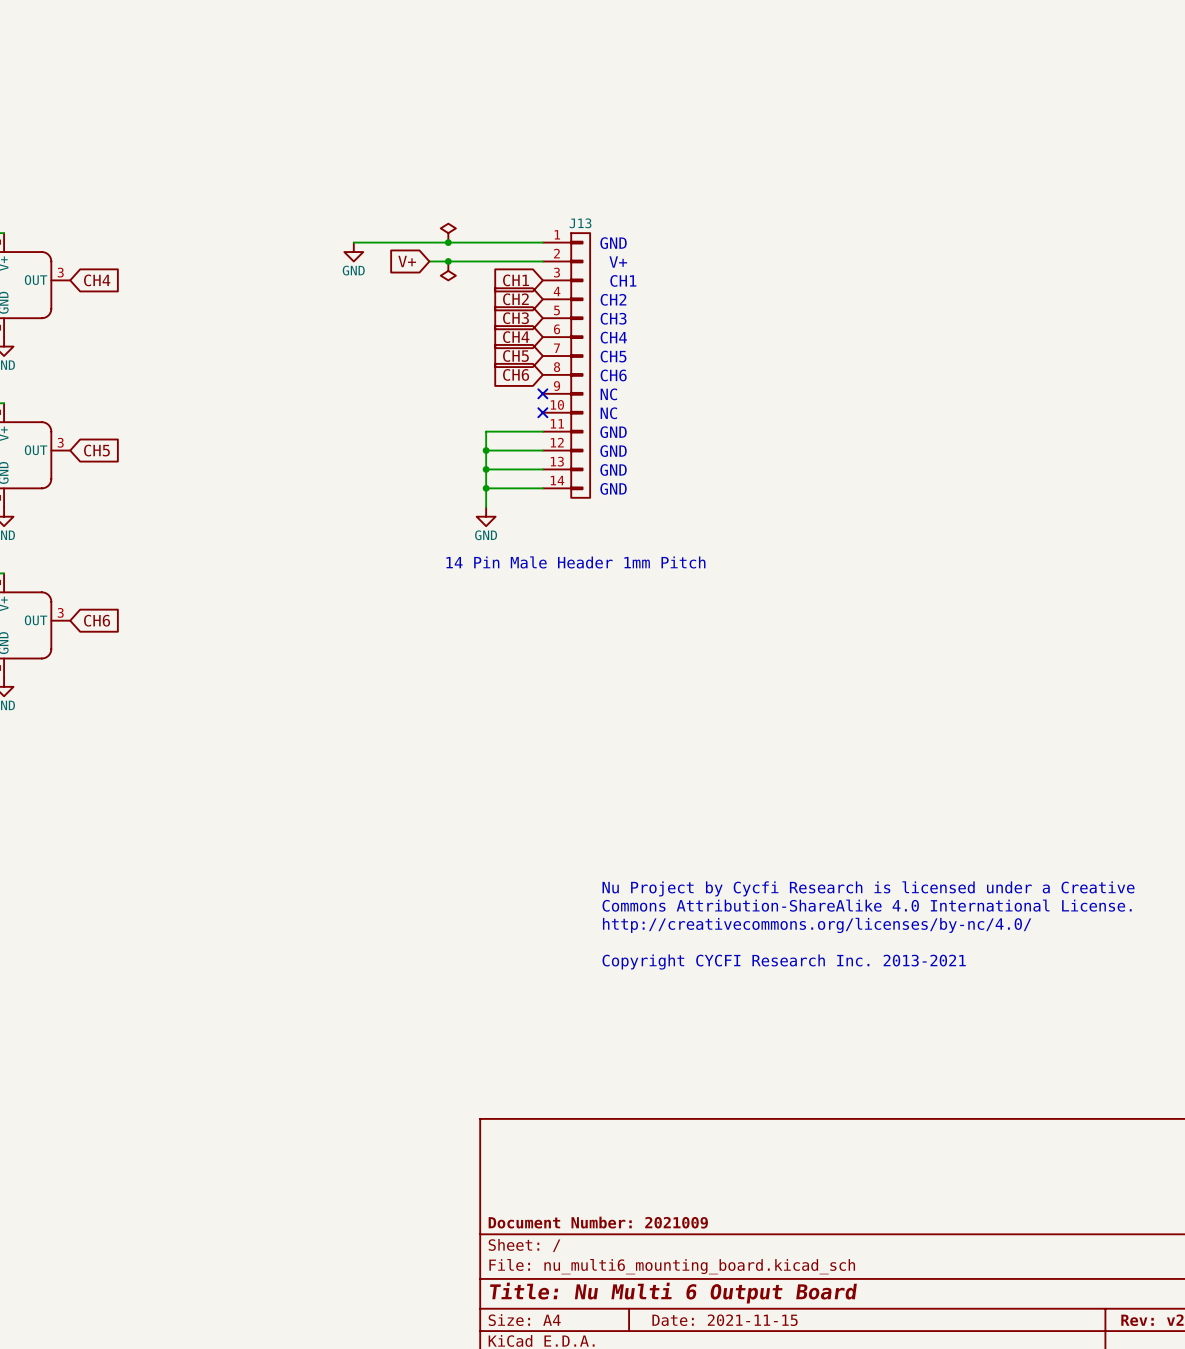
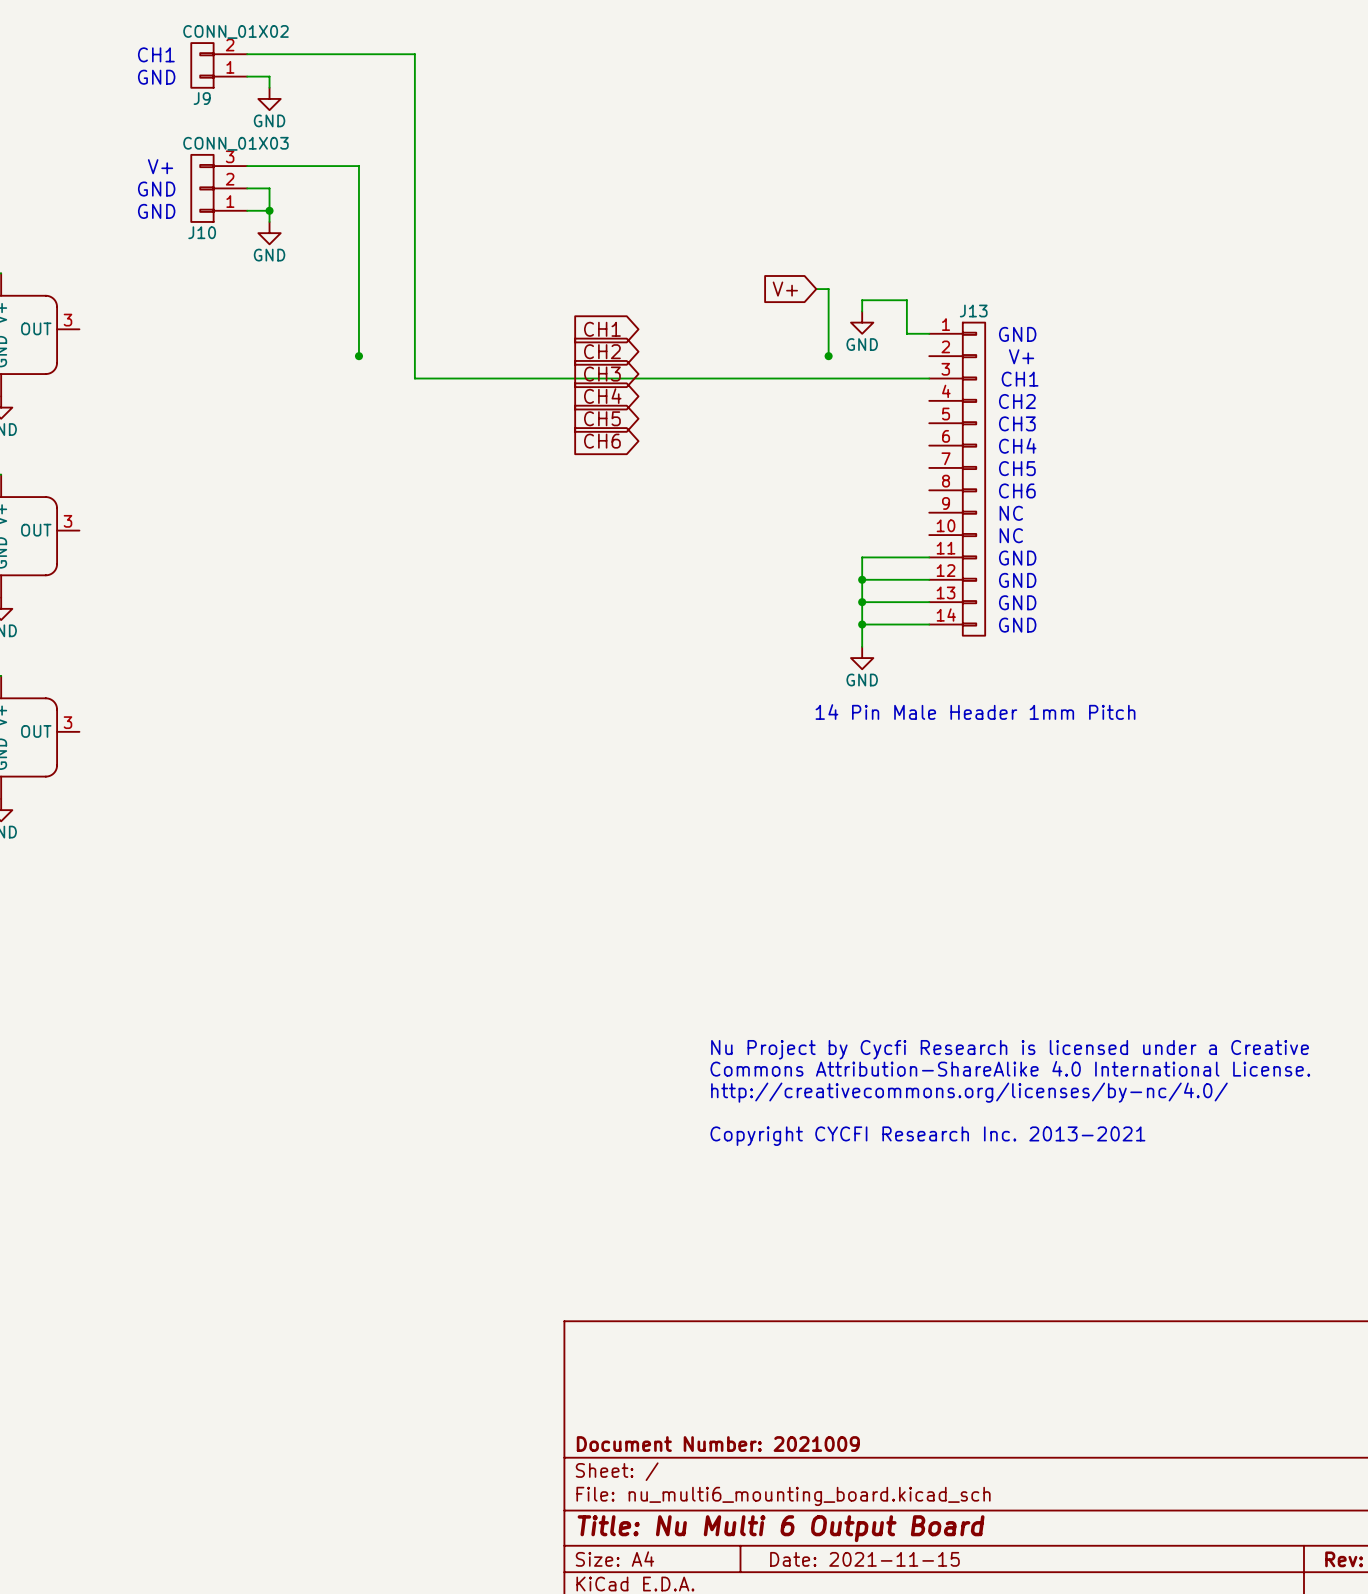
wire: none -> (247, 54) (414, 54) (414, 378) (929, 378)
text: none -> CH1 (156, 54)
J9: none -> CONN_01X02 (219, 65)
wire: none -> (247, 76) (269, 76) (269, 87)
text: none -> GND (156, 77)
power symbol: none -> GND (269, 98)
text: none -> V+ (160, 166)
wire: none -> (247, 166) (358, 166) (358, 356)
text: none -> GND (156, 189)
J10: none -> CONN_01X03 (219, 188)
wire: none -> (247, 188) (269, 188) (269, 221)
text: none -> GND (156, 211)
wire: none -> (247, 210) (269, 210)
junction: none -> (269, 210)
power symbol: none -> GND (269, 233)
power symbol: (448, 233) -> none
wire: (353, 242) (542, 242) -> none
junction: (448, 242) -> none
text: GND (613, 243) -> none
global label: none -> V+ (785, 289)
wire: none -> (816, 289) (828, 289) (828, 356)
power symbol: GND (353, 252) -> none
global label: V+ (407, 261) -> none
wire: (429, 261) (542, 261) -> none
junction: (448, 261) -> none
text: V+ (618, 262) -> none
wire: none -> (862, 311) (862, 300) (906, 300) (906, 333) (929, 333)
power symbol: (448, 270) -> none
power symbol: none -> GND (862, 322)
global label: CH4 (97, 280) -> none
text: CH1 (623, 280) -> none
text: none -> GND (1017, 334)
text: CH2 (613, 299) -> none
junction: none -> (358, 356)
junction: none -> (828, 356)
text: none -> V+ (1021, 356)
text: CH3 (613, 318) -> none
text: none -> CH1 (1020, 379)
text: CH4 (613, 337) -> none
text: none -> CH2 (1017, 401)
text: CH5 (613, 356) -> none
text: none -> CH3 (1017, 423)
J13 position: (566, 365) -> (957, 479)
text: CH6 (613, 375) -> none
text: none -> CH4 (1017, 445)
no-connect mark: (542, 393) -> none
text: NC (608, 394) -> none
text: none -> CH5 (1017, 468)
no-connect mark: (542, 412) -> none
text: NC (608, 413) -> none
text: none -> CH6 (1017, 490)
wire: (542, 431) (486, 431) (486, 507) -> none
text: GND (613, 432) -> none
text: none -> NC (1011, 513)
global label: CH5 (96, 450) -> none
wire: (486, 450) (542, 450) -> none
junction: (486, 450) -> none
text: GND (613, 451) -> none
text: none -> NC (1011, 535)
wire: (486, 469) (542, 469) -> none
junction: (486, 469) -> none
text: GND (613, 469) -> none
wire: none -> (929, 557) (862, 557) (862, 646)
text: none -> GND (1017, 558)
wire: (486, 488) (542, 488) -> none
junction: (486, 488) -> none
text: GND (613, 488) -> none
wire: none -> (862, 579) (929, 579)
junction: none -> (862, 579)
text: none -> GND (1017, 580)
wire: none -> (862, 602) (929, 602)
junction: none -> (862, 602)
text: none -> GND (1017, 602)
power symbol: GND (486, 516) -> none
wire: none -> (862, 624) (929, 624)
junction: none -> (862, 624)
text: none -> GND (1017, 625)
power symbol: none -> GND (862, 658)
text: 14 Pin Male Header 1mm Pitch (575, 562) -> none
text: none -> 14 Pin Male Header 1mm Pitch (975, 712)
global label: CH6 (97, 620) -> none

